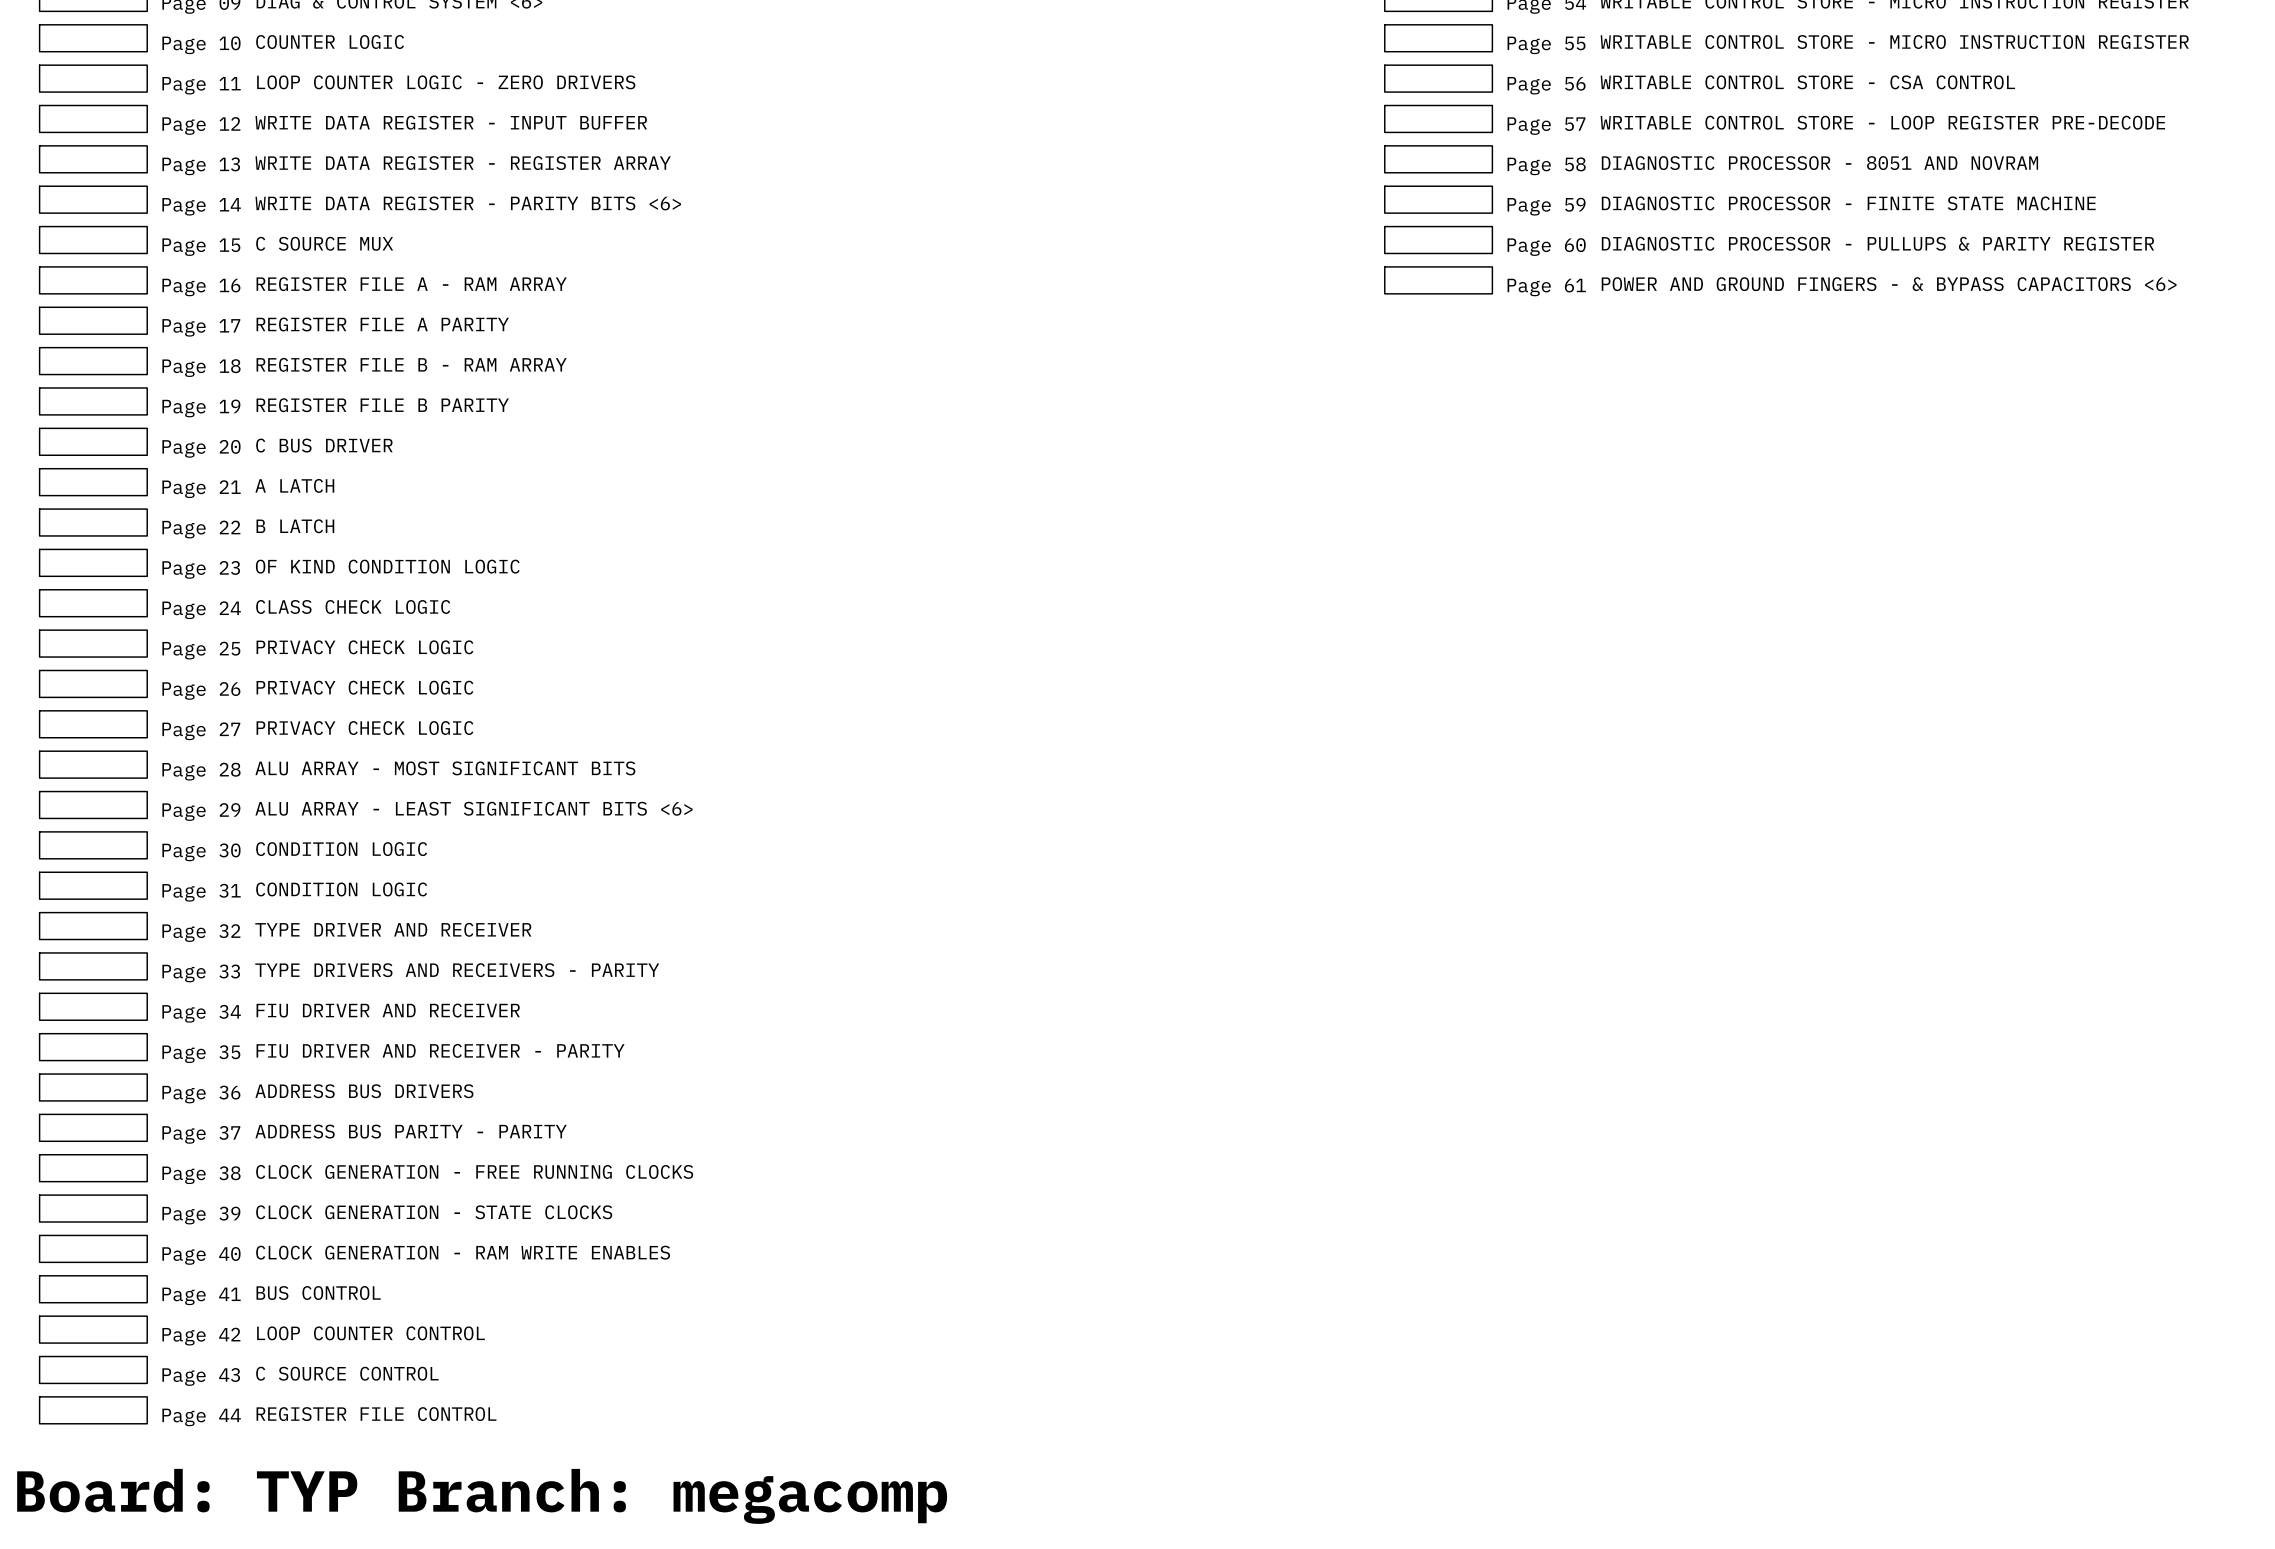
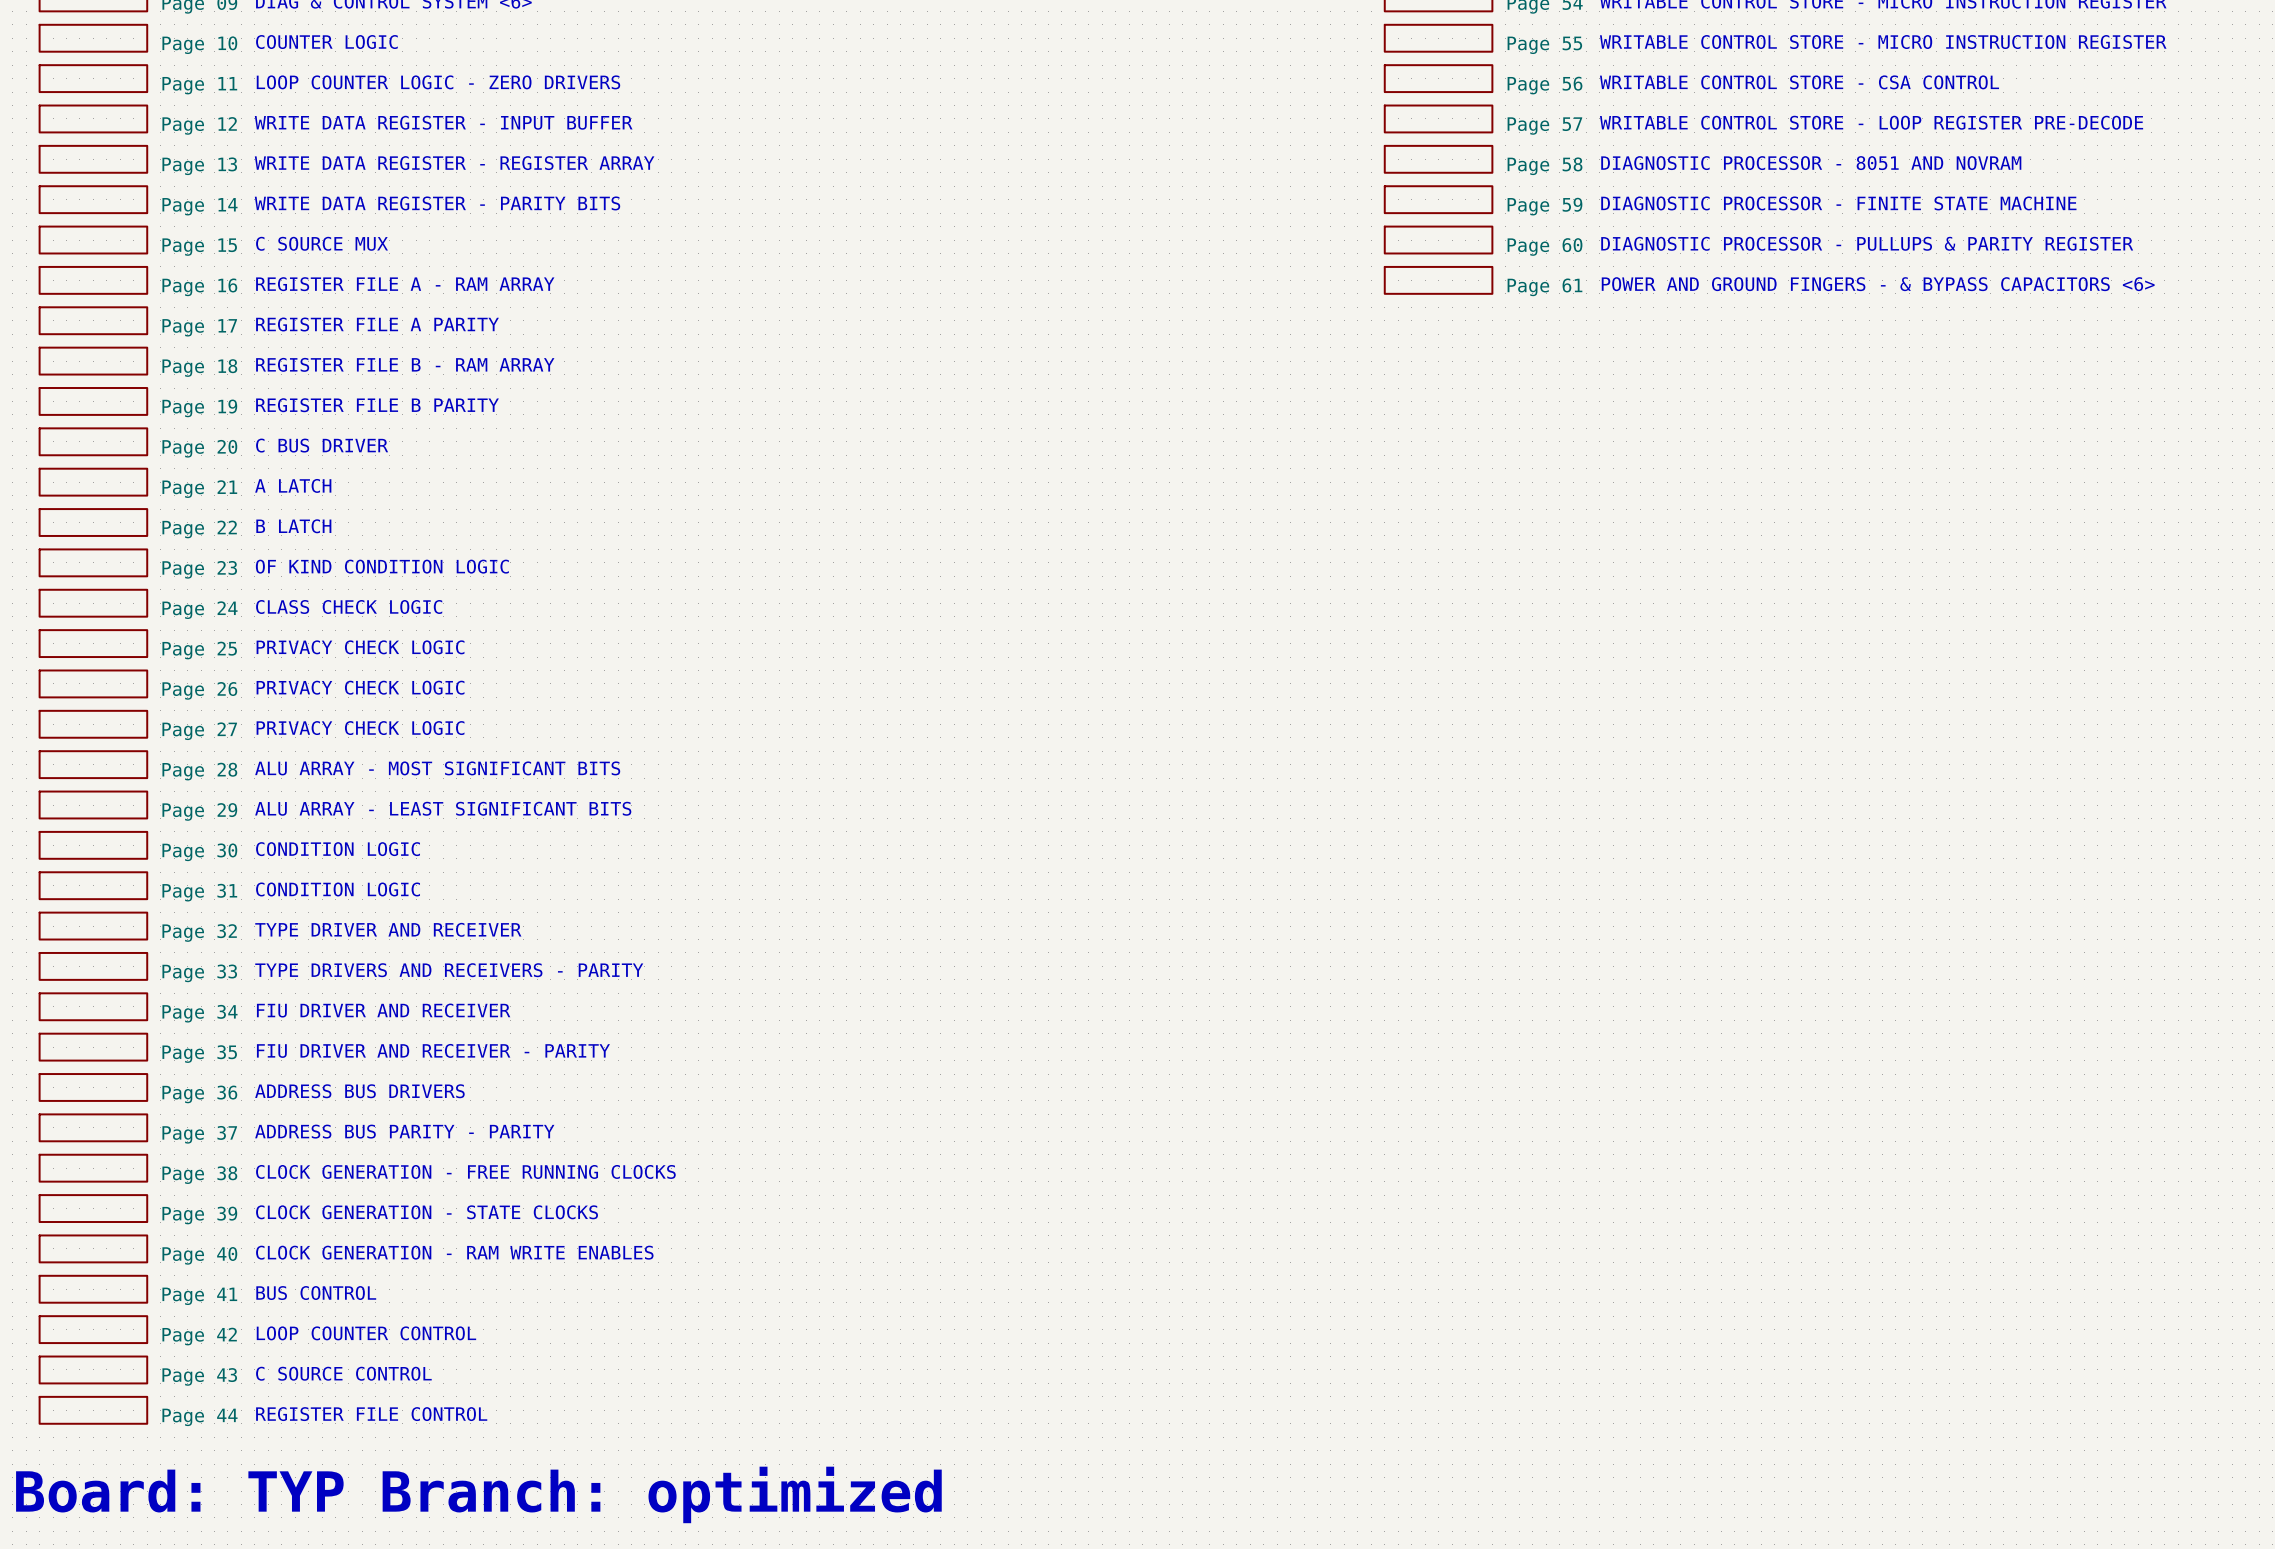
text: WRITE DATA REGISTER - PARITY BITS <6> (468, 203) -> WRITE DATA REGISTER - PARITY BITS (437, 203)
text: ALU ARRAY - LEAST SIGNIFICANT BITS <6> (474, 808) -> ALU ARRAY - LEAST SIGNIFICANT BITS (443, 808)
text: Board: TYP Branch: megacomp (482, 1496) -> Board: TYP Branch: optimized (478, 1494)

